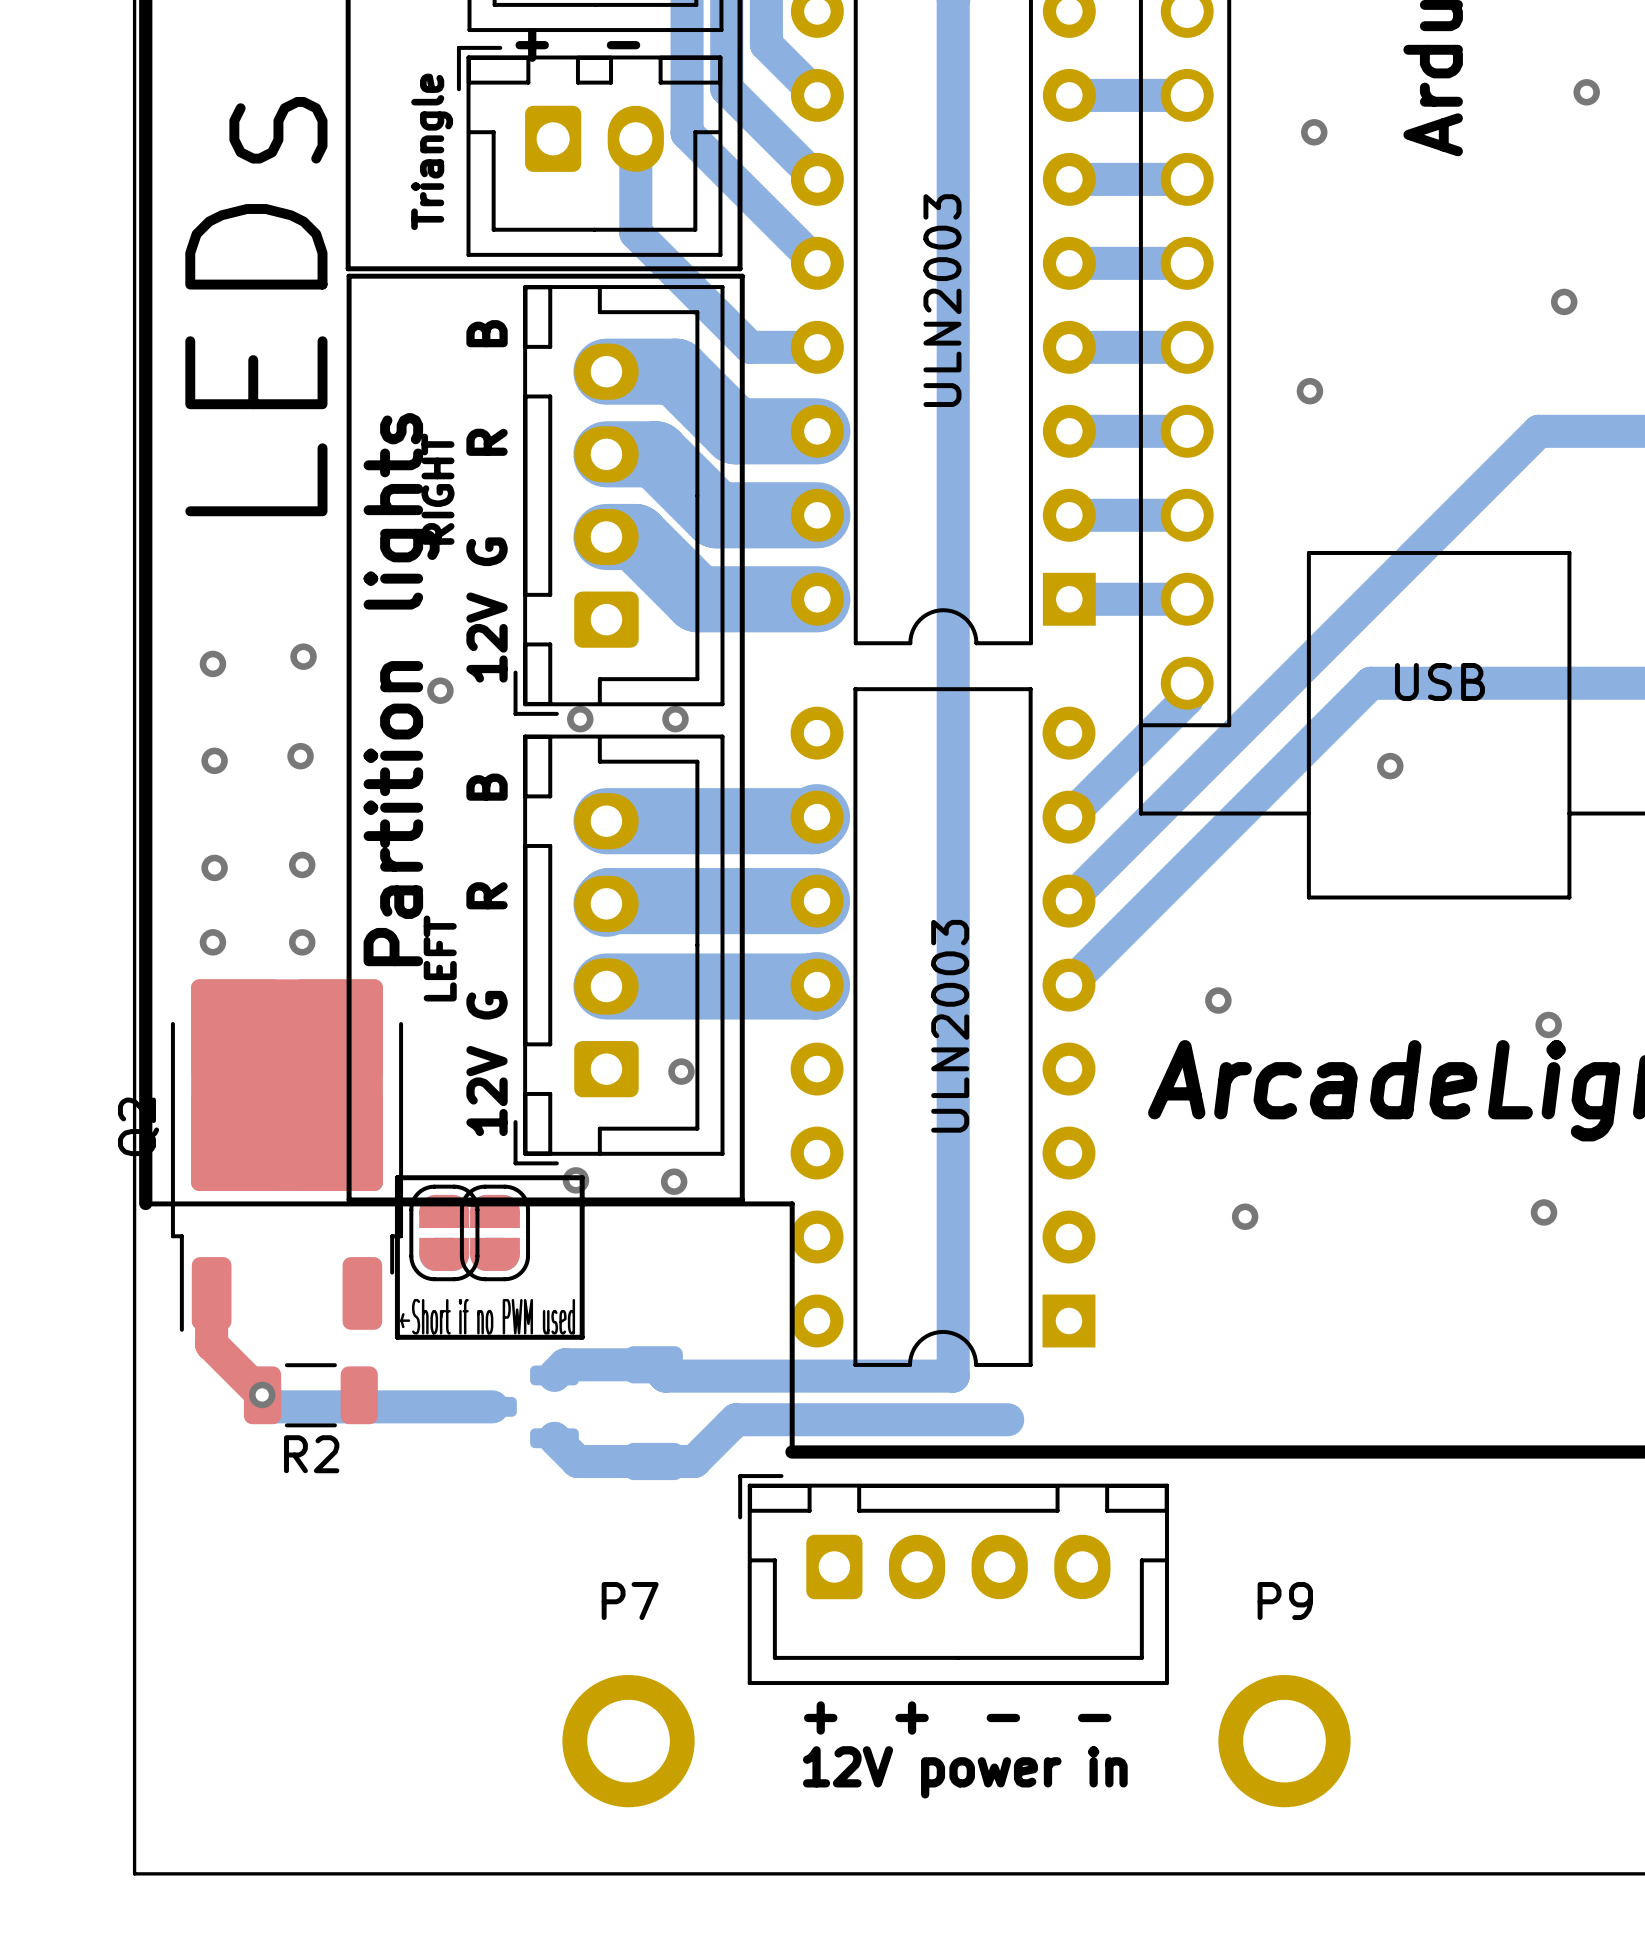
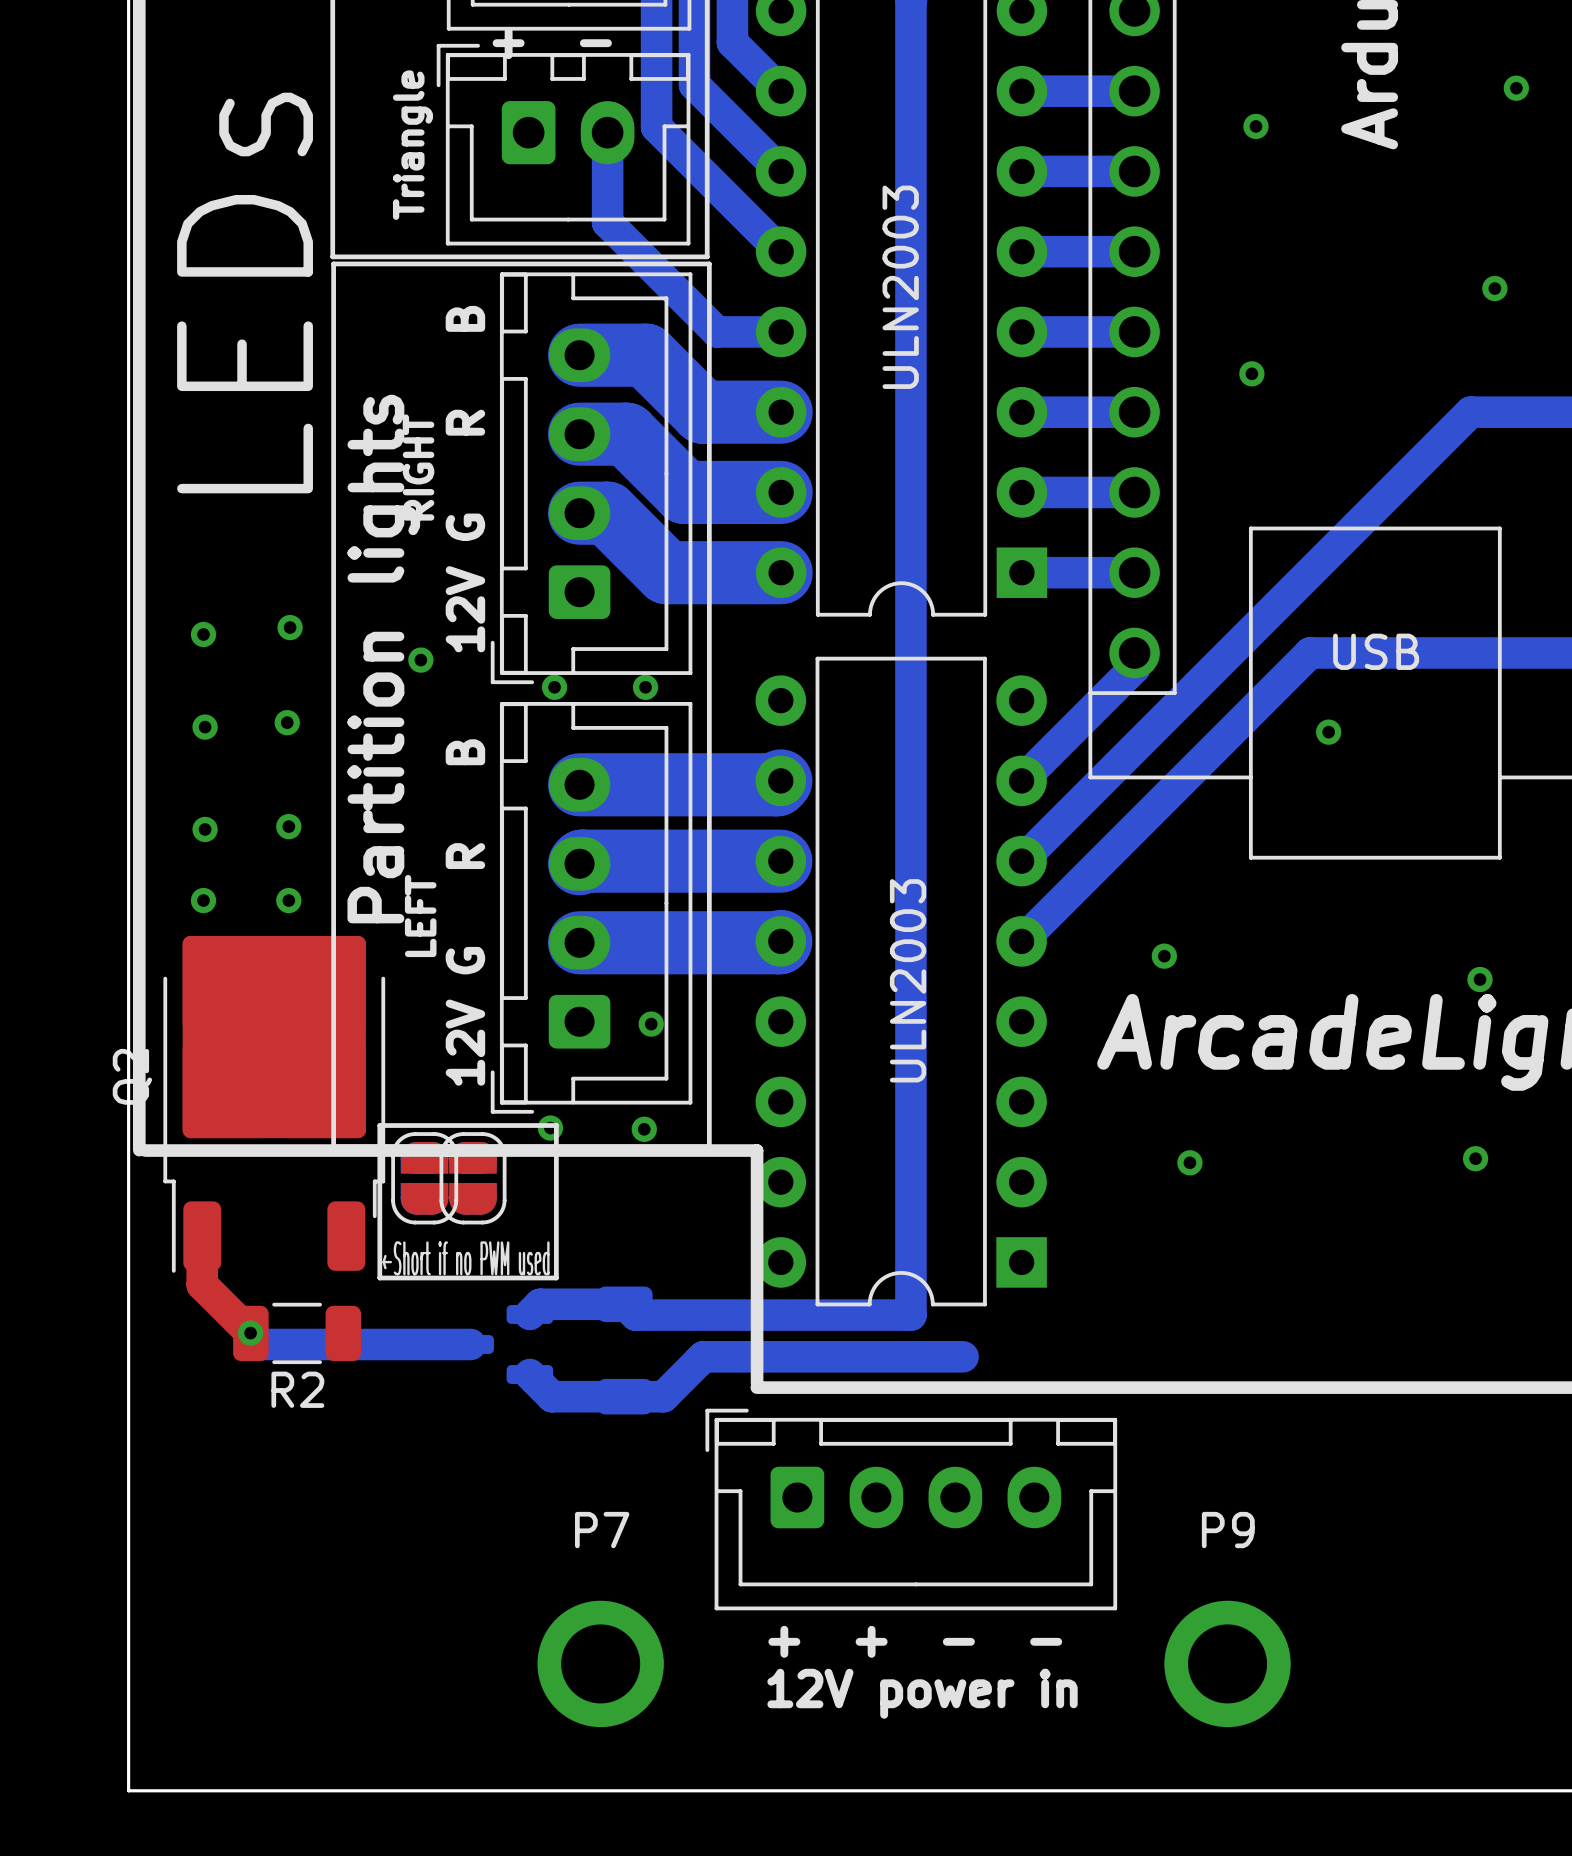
line width: thin (151, 1203) (792, 1203) (792, 1447) -> thick (145, 1150) (757, 1150) (757, 1383)

